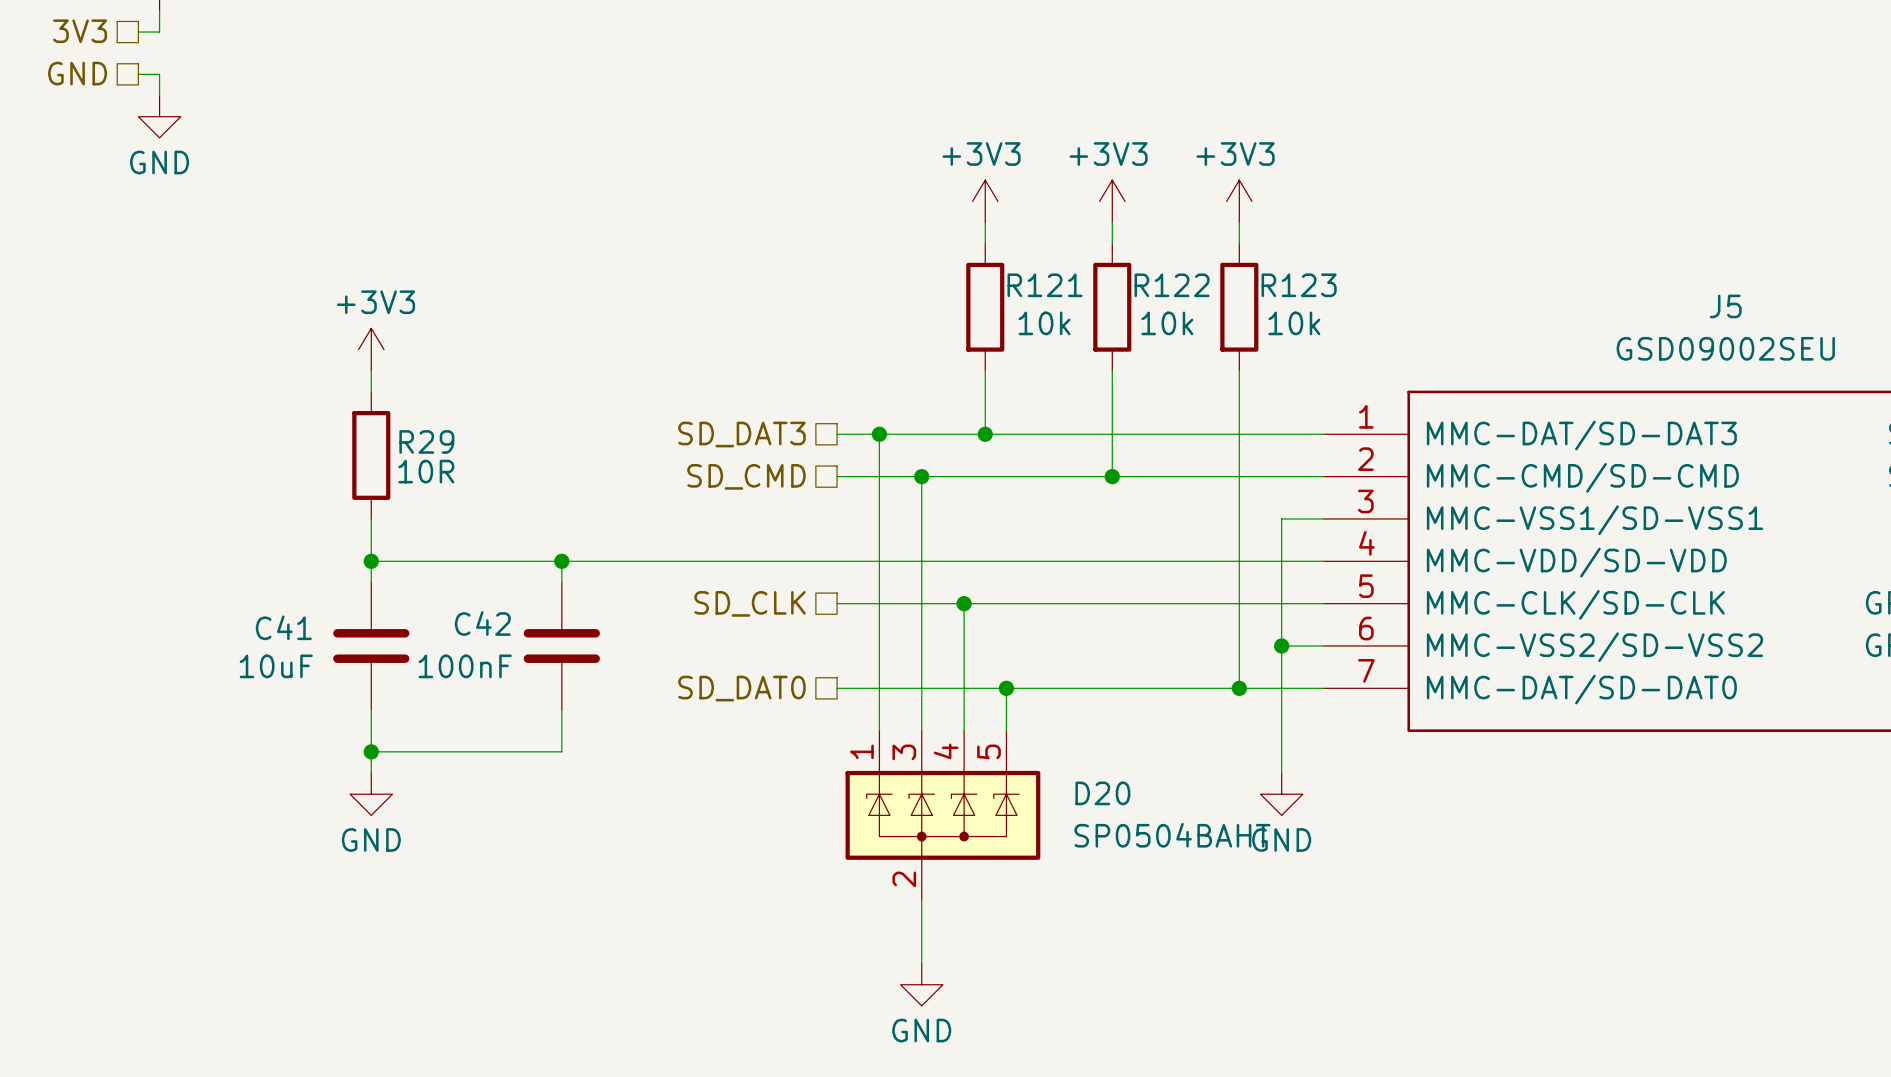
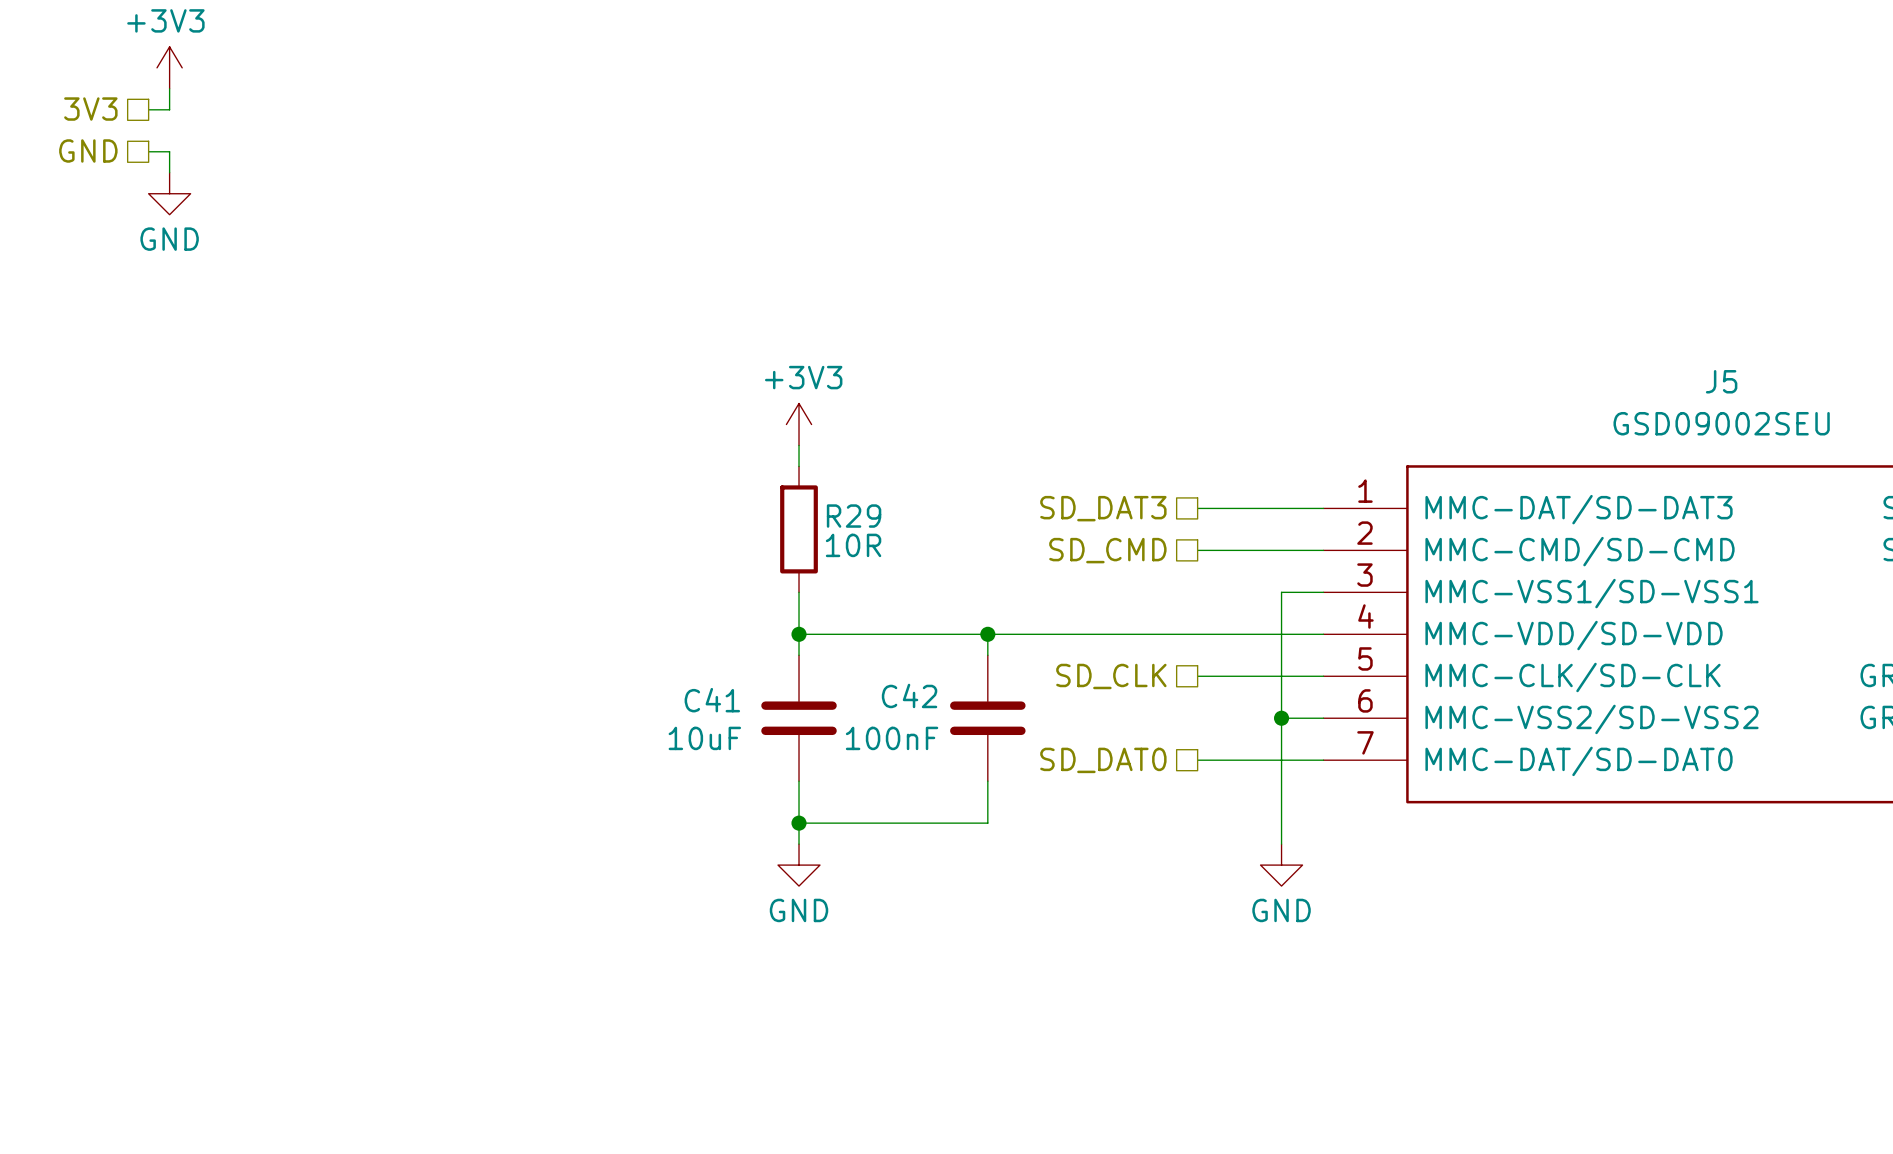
power symbol: +3V3 (985, 201) -> none
power symbol: +3V3 (1112, 201) -> none
power symbol: +3V3 (1239, 201) -> none
wire: (985, 222) (985, 243) -> (799, 445) (799, 466)
wire: (1112, 222) (1112, 243) -> (987, 634) (987, 655)
wire: (1239, 222) (1239, 243) -> none
R121: 10k (985, 307) -> none
R122: 10k (1112, 307) -> none
R123: 10k (1239, 307) -> none
power symbol: +3V3 (371, 349) -> none
power symbol: none -> +3V3 (799, 424)
wire: (371, 370) (371, 391) -> none
wire: (985, 370) (985, 434) -> (799, 592) (799, 655)
wire: (1112, 370) (1112, 476) -> none
wire: (1239, 370) (1239, 688) -> none
hierarchical label position: SD_DAT3 (741, 434) -> SD_DAT3 (1103, 508)
wire: (837, 434) (1196, 434) -> none
wire: (879, 434) (879, 730) -> none
junction: (879, 434) -> none
junction: (985, 434) -> none
R29 position: (371, 455) -> (799, 529)
hierarchical label position: SD_CMD (746, 476) -> SD_CMD (1107, 550)
wire: (837, 476) (1196, 476) -> none
wire: (921, 476) (921, 730) -> none
junction: (921, 476) -> none
junction: (1112, 476) -> none
wire: (371, 518) (371, 582) -> none
wire: (371, 561) (794, 561) -> none
junction: (371, 561) -> none
wire: (561, 561) (561, 582) -> none
junction: (561, 561) -> none
junction: none -> (799, 634)
hierarchical label position: SD_CLK (750, 603) -> SD_CLK (1111, 676)
wire: (837, 603) (1196, 603) -> none
wire: (964, 603) (964, 730) -> none
junction position: (964, 603) -> (987, 634)
C41 position: (371, 646) -> (799, 718)
C42 position: (561, 646) -> (987, 718)
hierarchical label position: SD_DAT0 (741, 688) -> SD_DAT0 (1103, 760)
wire: (837, 688) (1196, 688) -> none
wire: (1006, 688) (1006, 730) -> none
junction: (1006, 688) -> none
junction: (1239, 688) -> none
wire: (371, 709) (371, 773) -> none
wire: (561, 709) (561, 751) (371, 751) -> none
wire: none -> (987, 781) (987, 823) (799, 823)
junction: (371, 751) -> none
junction: none -> (799, 823)
power symbol: GND (371, 794) -> none
power symbol: none -> GND (799, 865)
D20: SP0504BAHT (942, 815) -> none
wire: (921, 900) (921, 963) -> (799, 781) (799, 844)
power symbol: GND (921, 984) -> none

